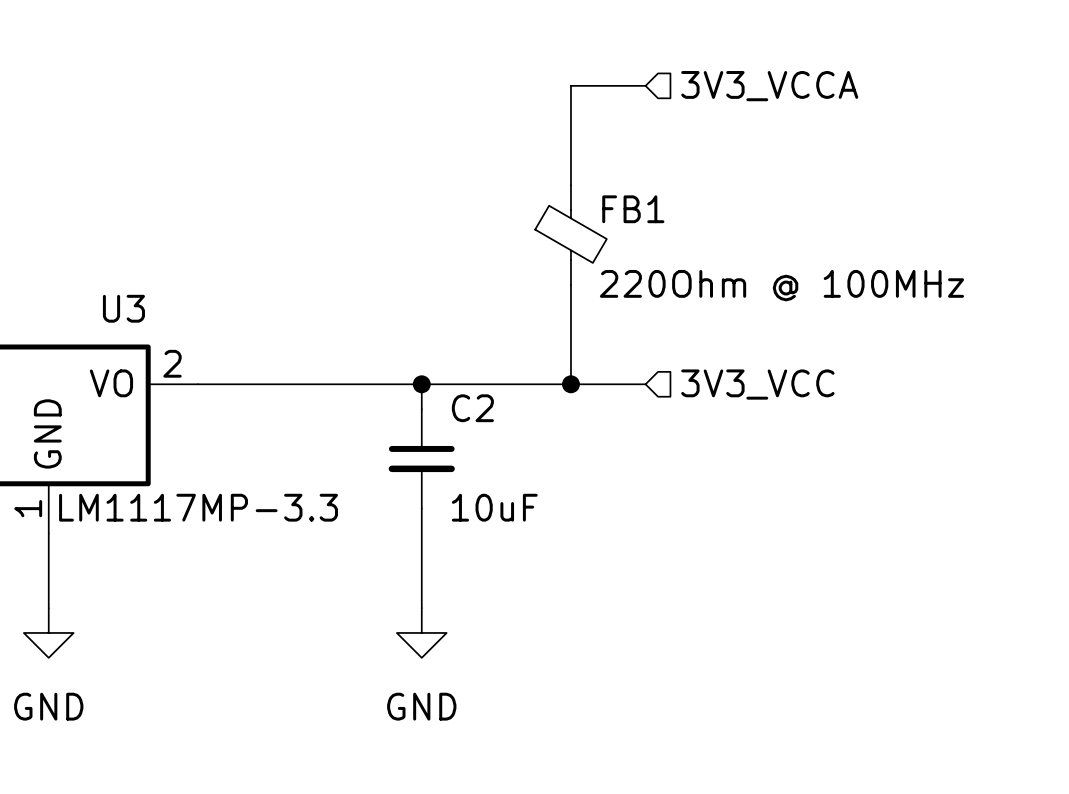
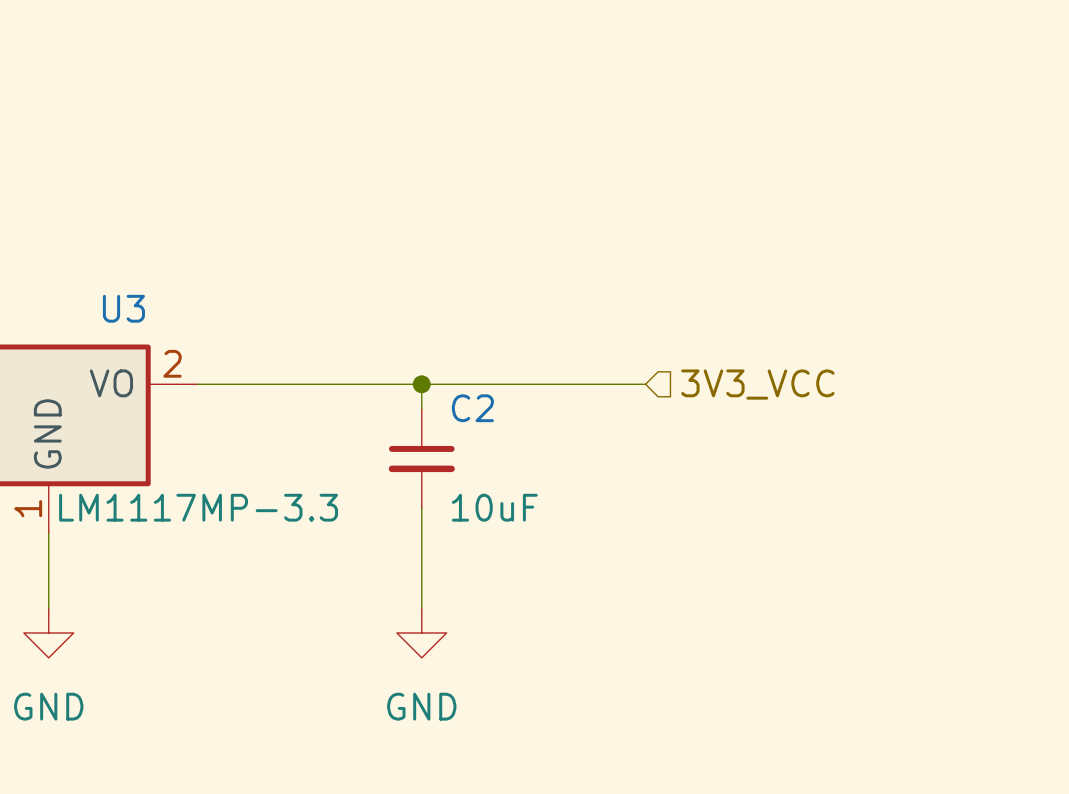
wire: (645, 85) (570, 85) (570, 185) -> none
hierarchical label: 3V3_VCCA (769, 86) -> none
FB1: 220Ohm @ 100MHz (570, 235) -> none
wire: (570, 284) (570, 384) -> none
junction: (570, 384) -> none

